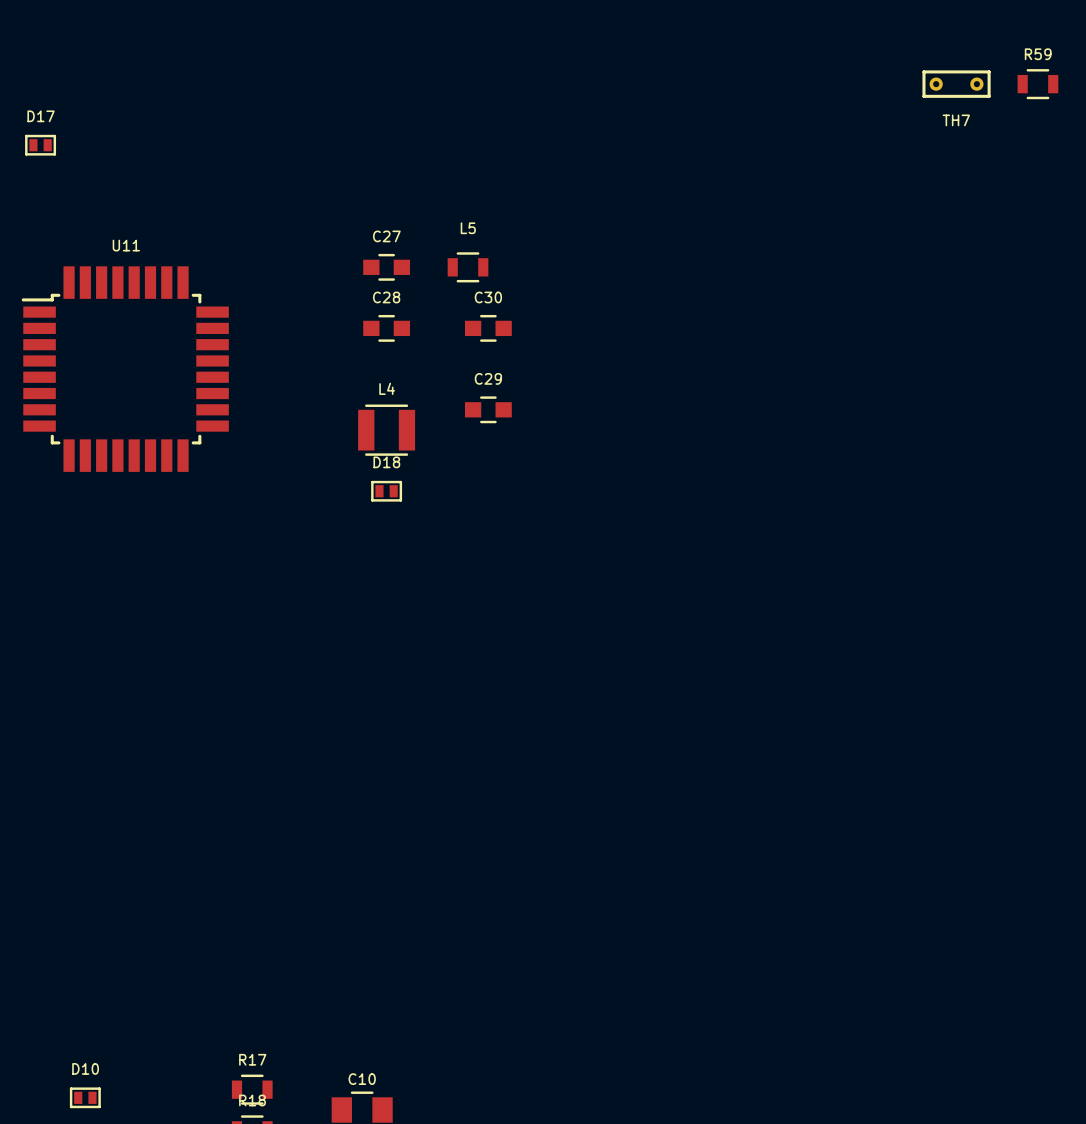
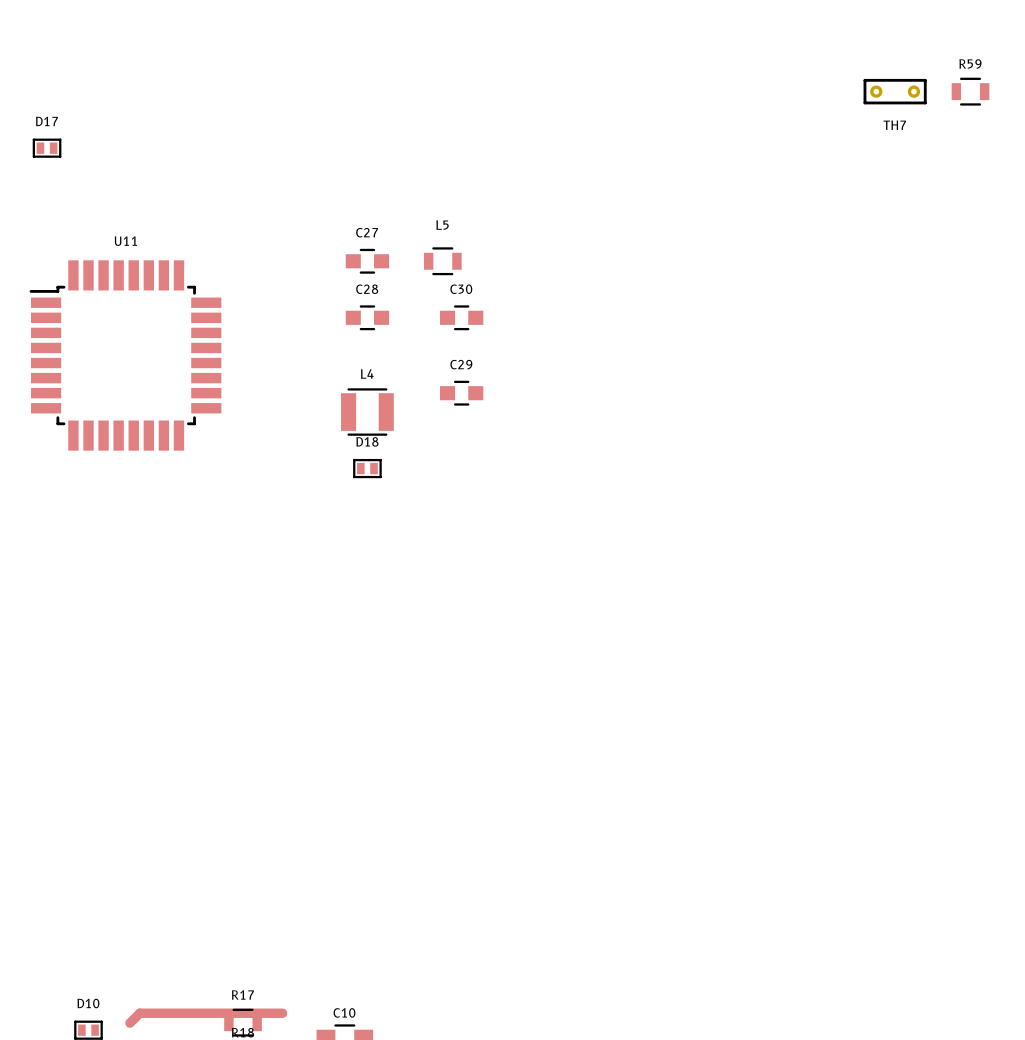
track: none -> (282, 1013) (139, 1013) (129, 1023)

